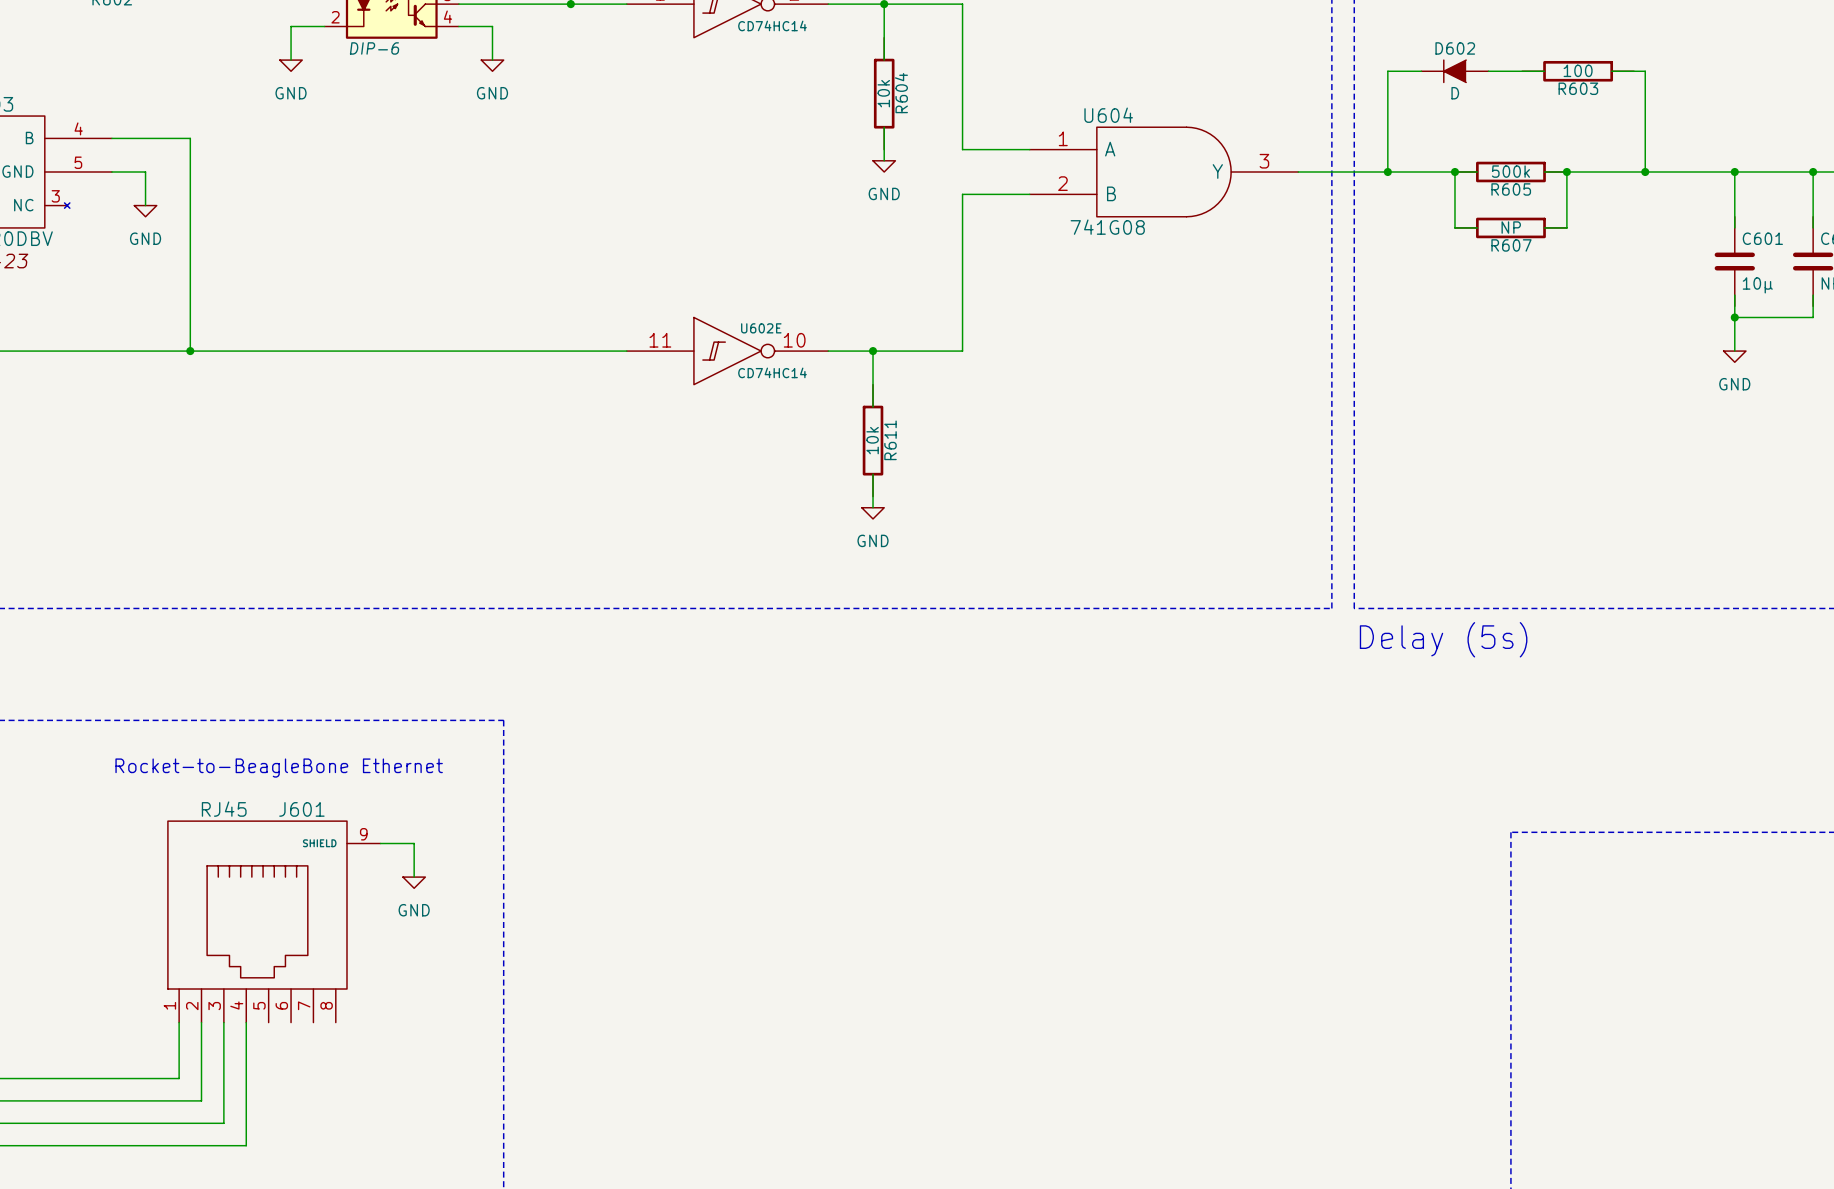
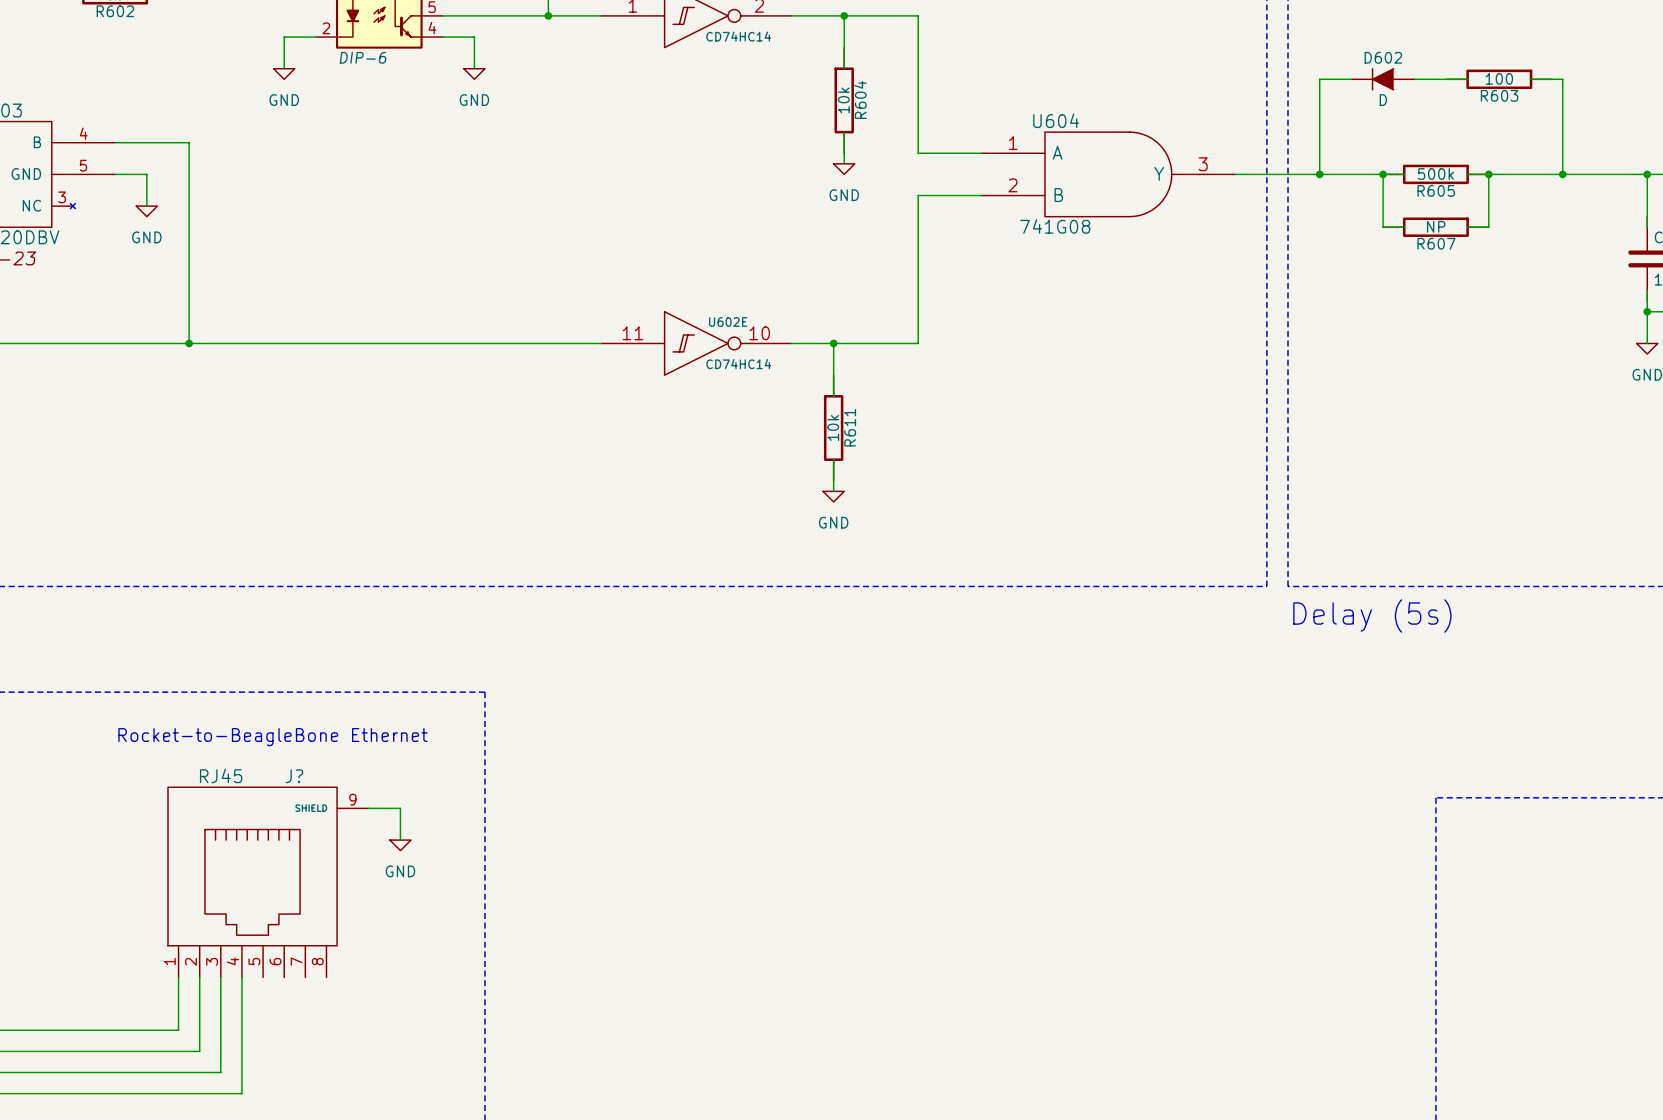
J601 name: J601 (301, 809) -> J? (294, 776)

